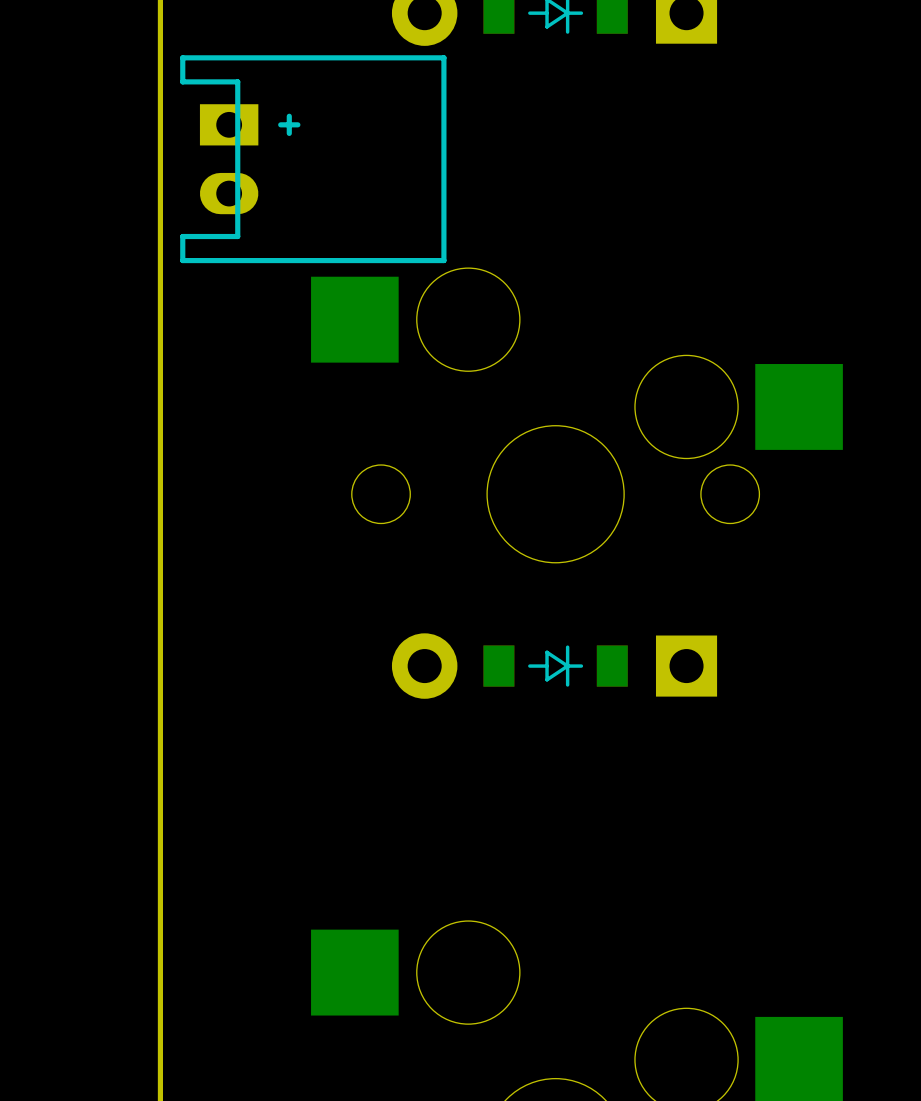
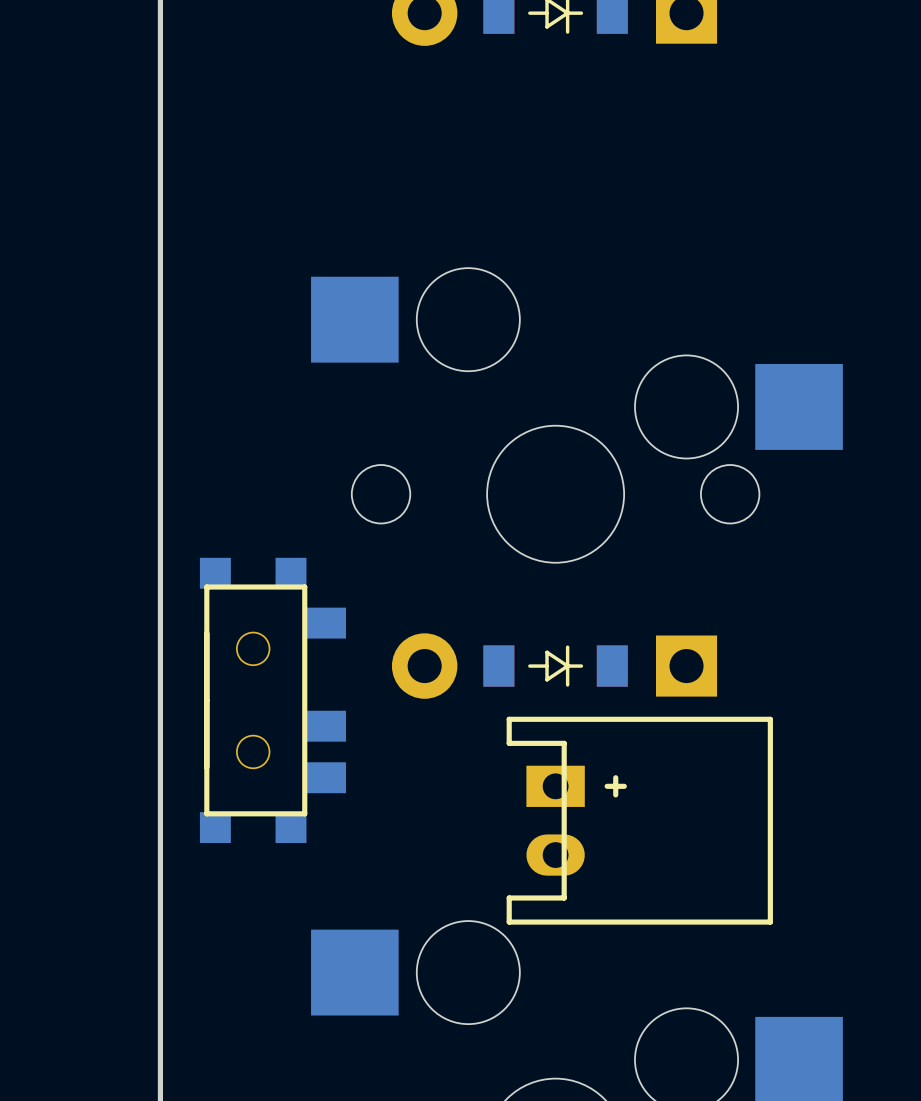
part position: (313, 159) -> (639, 820)
part: none -> (272, 700)

